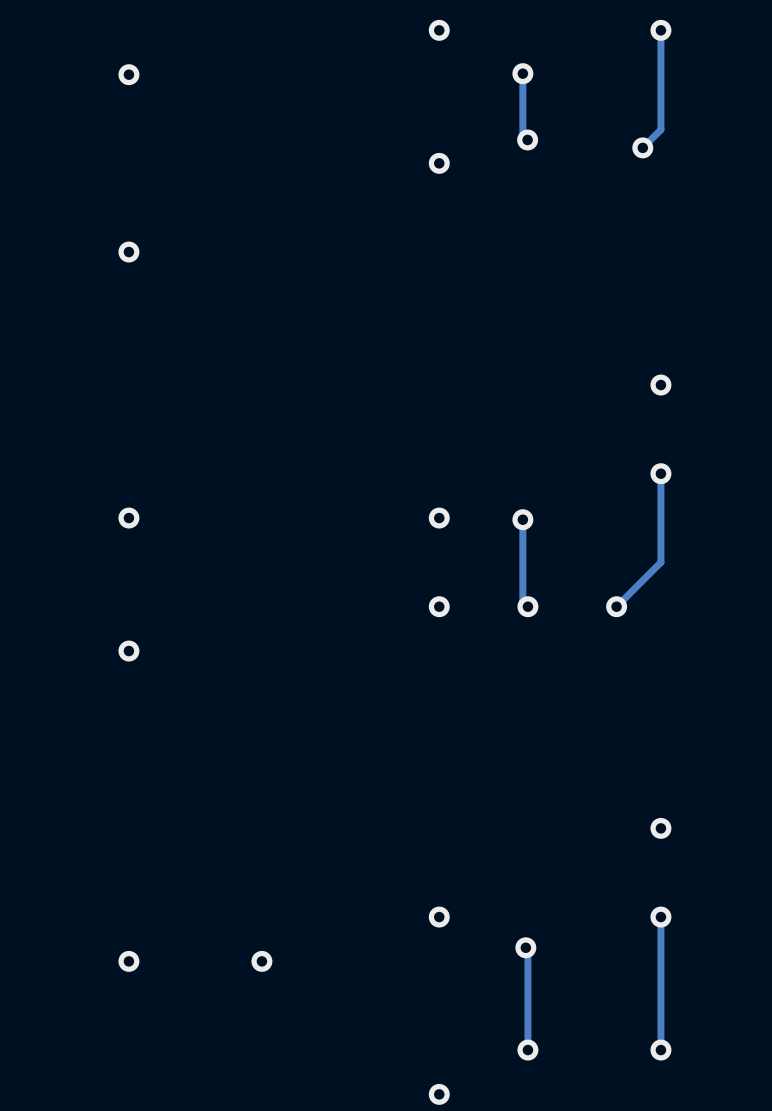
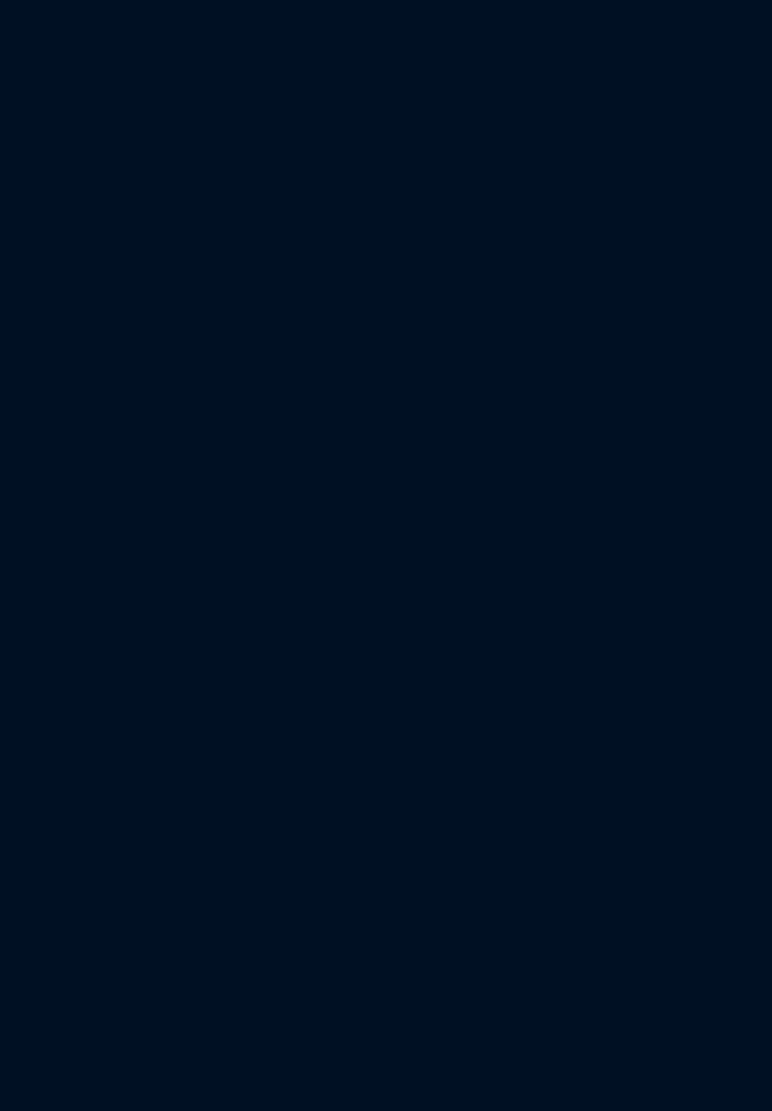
via: (439, 30) -> none
track: (660, 30) (660, 129) (642, 147) -> none
via: (660, 30) -> none
track: (522, 73) (522, 135) (527, 139) -> none
via: (522, 73) -> none
via: (128, 74) -> none
via: (527, 139) -> none
via: (642, 147) -> none
via: (439, 163) -> none
via: (128, 252) -> none
via: (660, 385) -> none
track: (660, 473) (660, 562) (616, 606) -> none
via: (660, 473) -> none
via: (128, 518) -> none
via: (439, 518) -> none
track: (522, 519) (522, 601) (527, 606) -> none
via: (522, 519) -> none
via: (439, 606) -> none
via: (527, 606) -> none
via: (616, 606) -> none
via: (128, 651) -> none
via: (660, 828) -> none
via: (439, 917) -> none
track: (660, 917) (660, 1050) -> none
via: (660, 917) -> none
track: (525, 947) (527, 949) (527, 1050) -> none
via: (525, 947) -> none
via: (128, 961) -> none
via: (261, 961) -> none
via: (527, 1050) -> none
via: (660, 1050) -> none
via: (439, 1094) -> none

